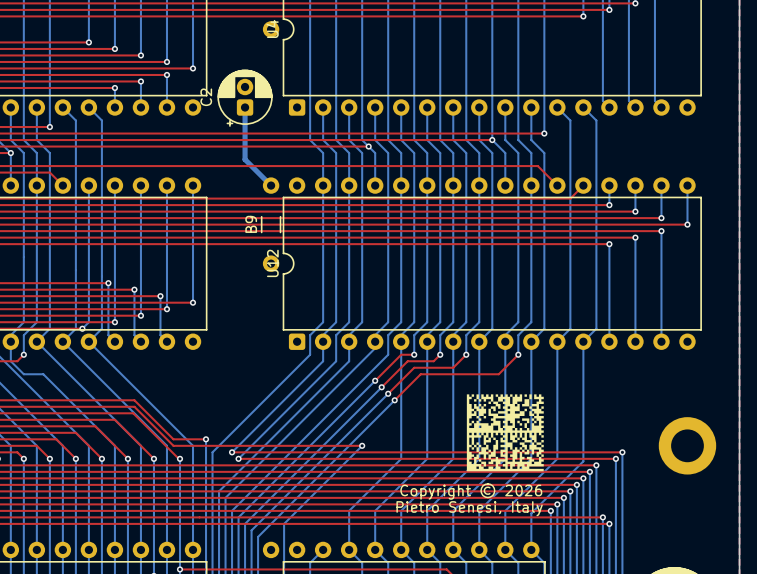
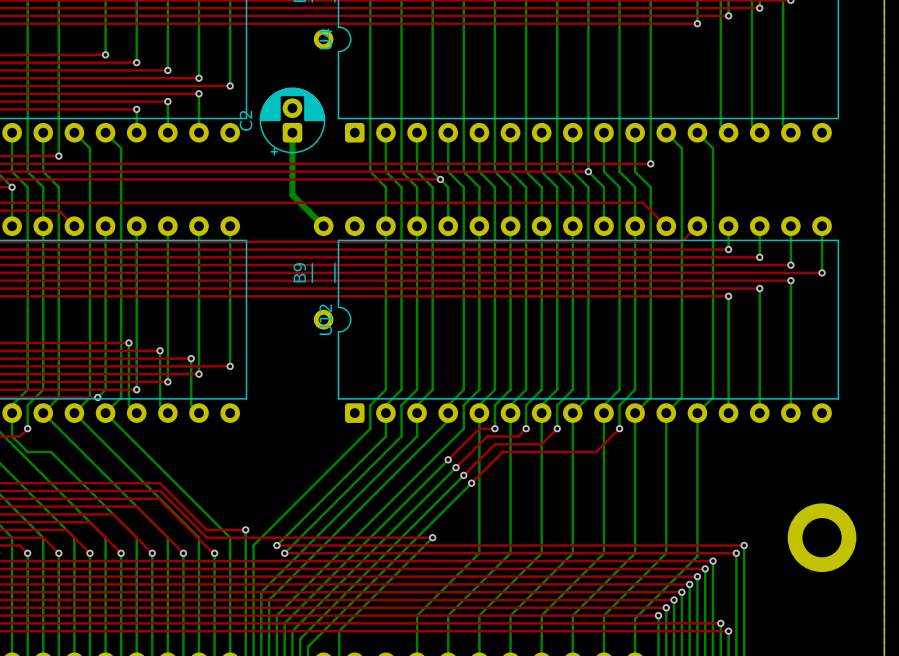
drawing: [466, 394, 544, 472] -> none
text: Copyright © 2026 (471, 491) -> none
text: Pietro Senesi, Italy (469, 508) -> none

